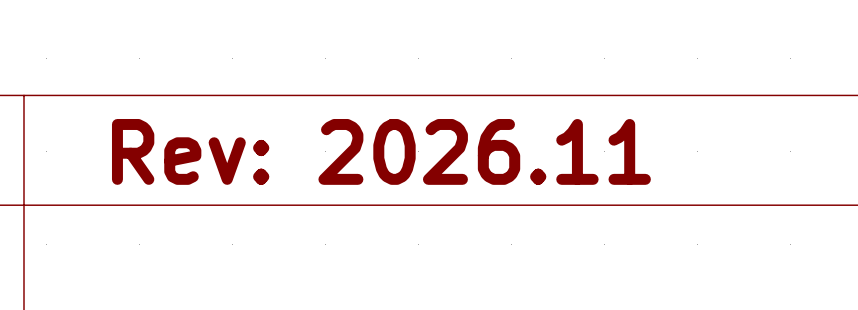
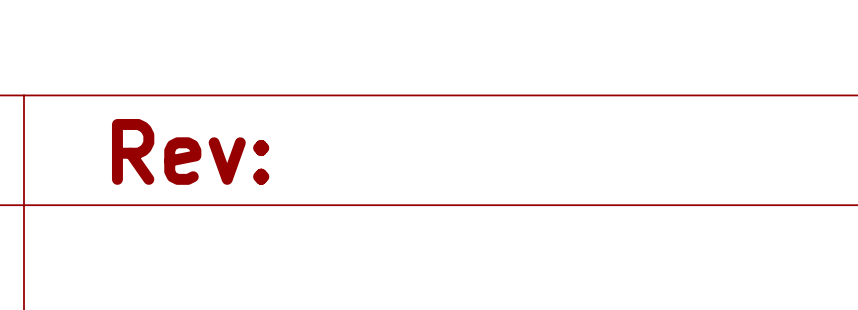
title block: Rev: 2026.11 (381, 151) -> Rev: (190, 151)

